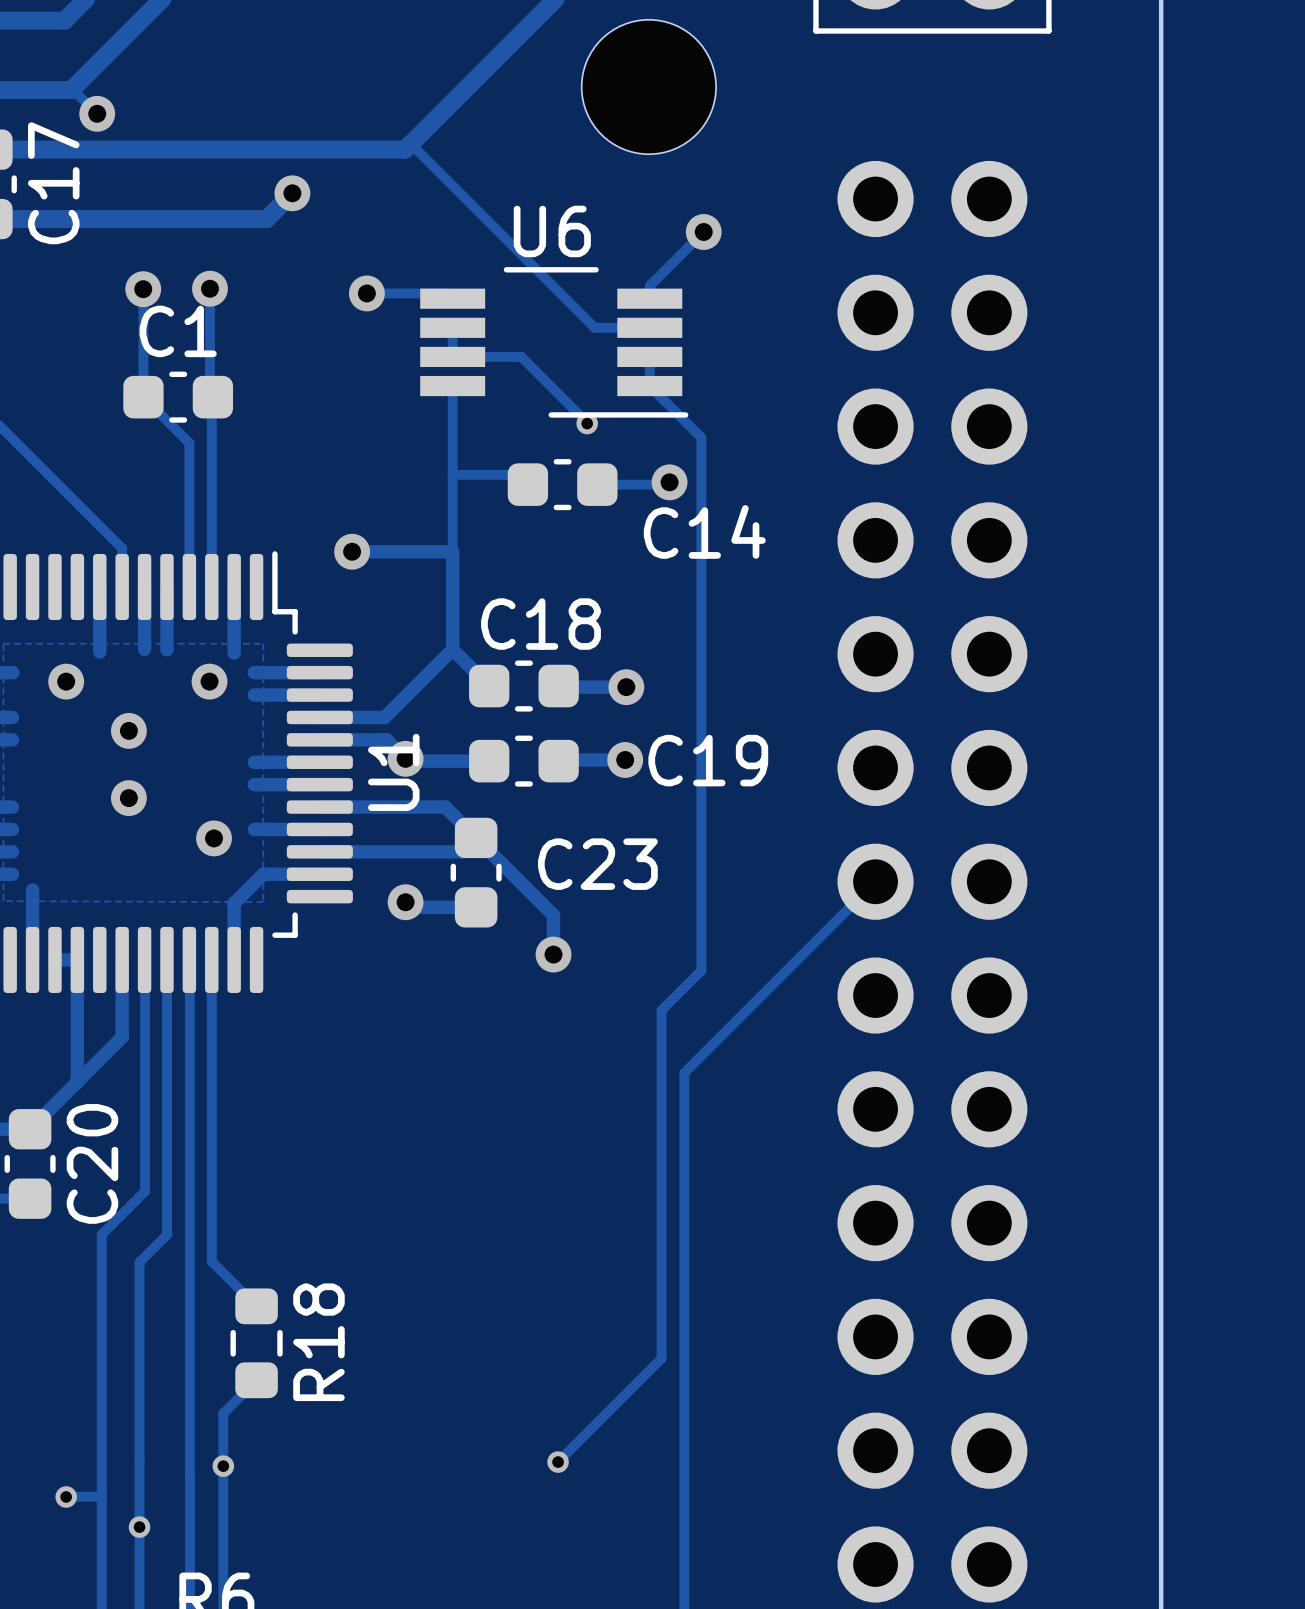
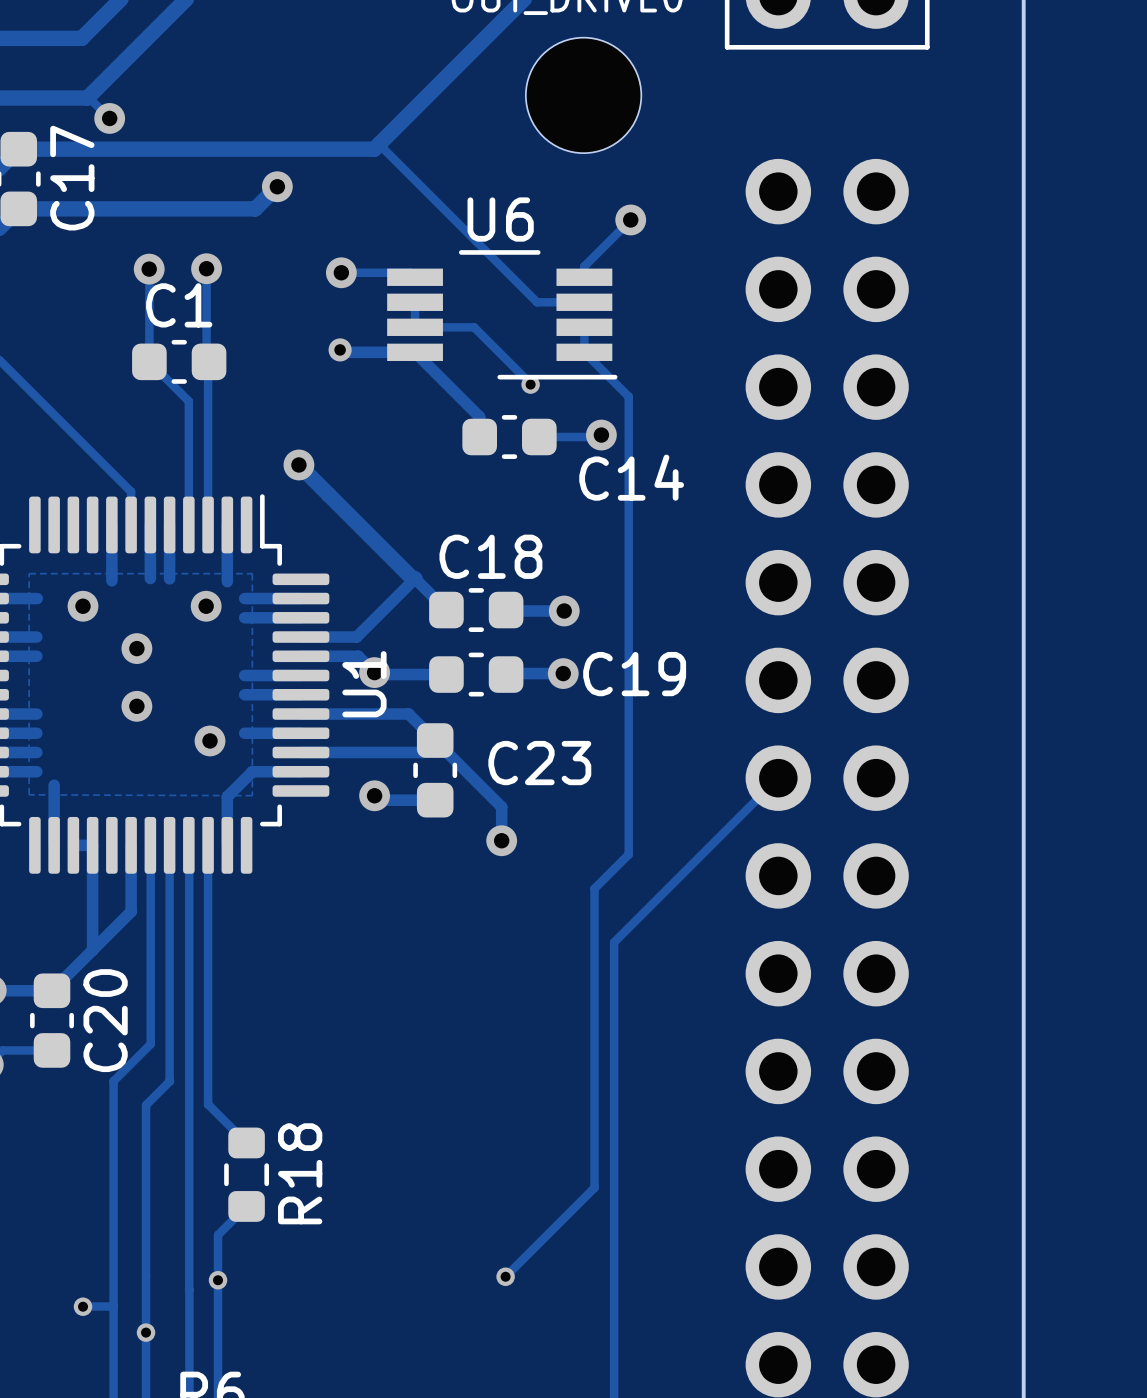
via: none -> (340, 349)
track: (452, 386) (452, 649) -> (298, 464) (412, 578) (415, 578)
track: (452, 474) (518, 474) (527, 484) -> (340, 349) (342, 352) (415, 352) (479, 416) (479, 437)
track: (352, 551) (452, 551) -> none
via position: (352, 551) -> (298, 464)

